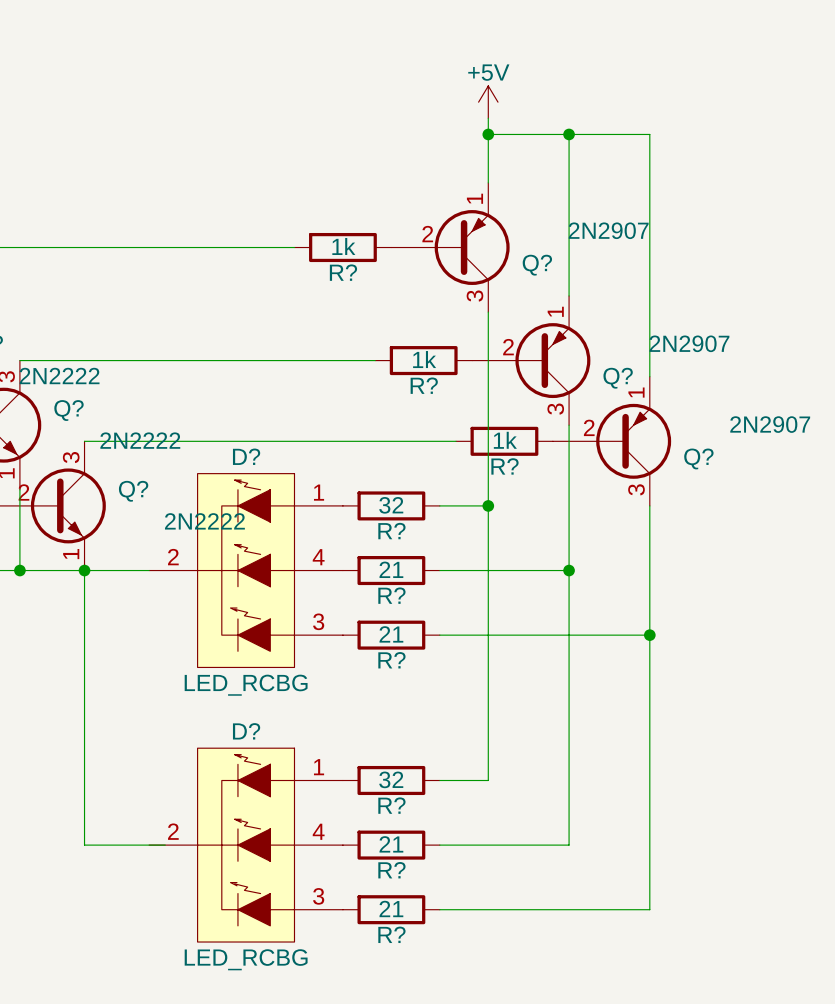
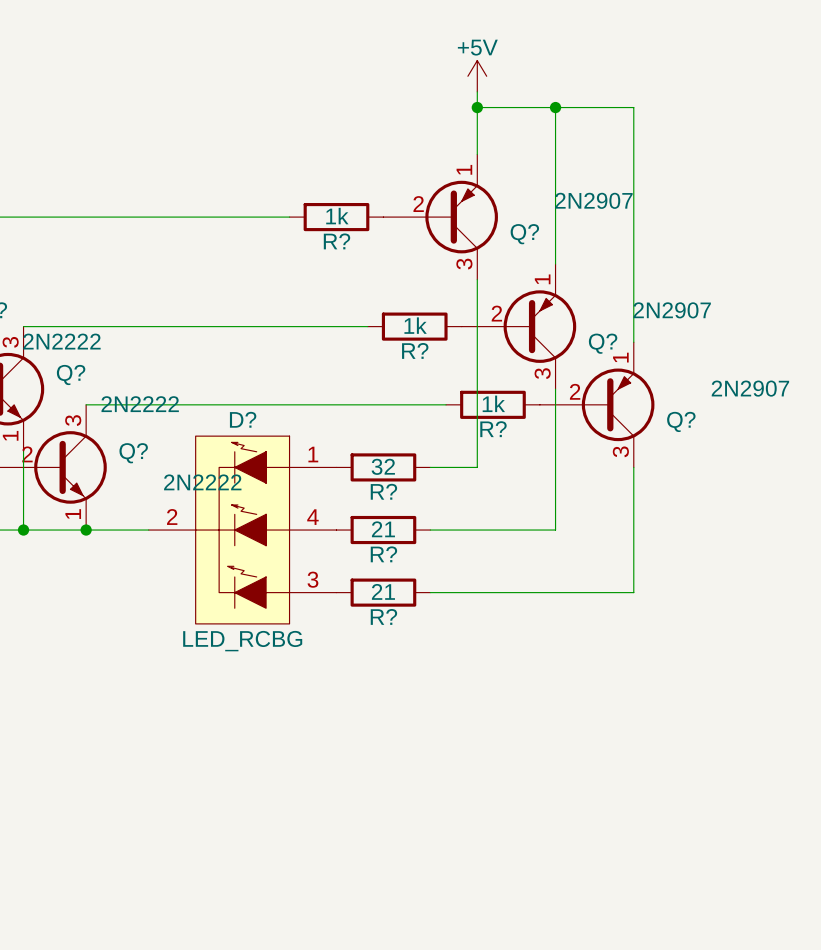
wire: (488, 505) (488, 780) (439, 780) -> none
junction: (488, 505) -> none
wire: (84, 570) (84, 845) (165, 845) -> none
wire: (569, 570) (569, 845) (439, 845) -> none
junction: (569, 570) -> none
wire: (649, 635) (649, 909) (439, 909) -> none
junction: (649, 635) -> none
R?: 32 (391, 780) -> none
D?: LED_RCBG (246, 845) -> none
R?: 21 (391, 845) -> none
R?: 21 (391, 909) -> none

